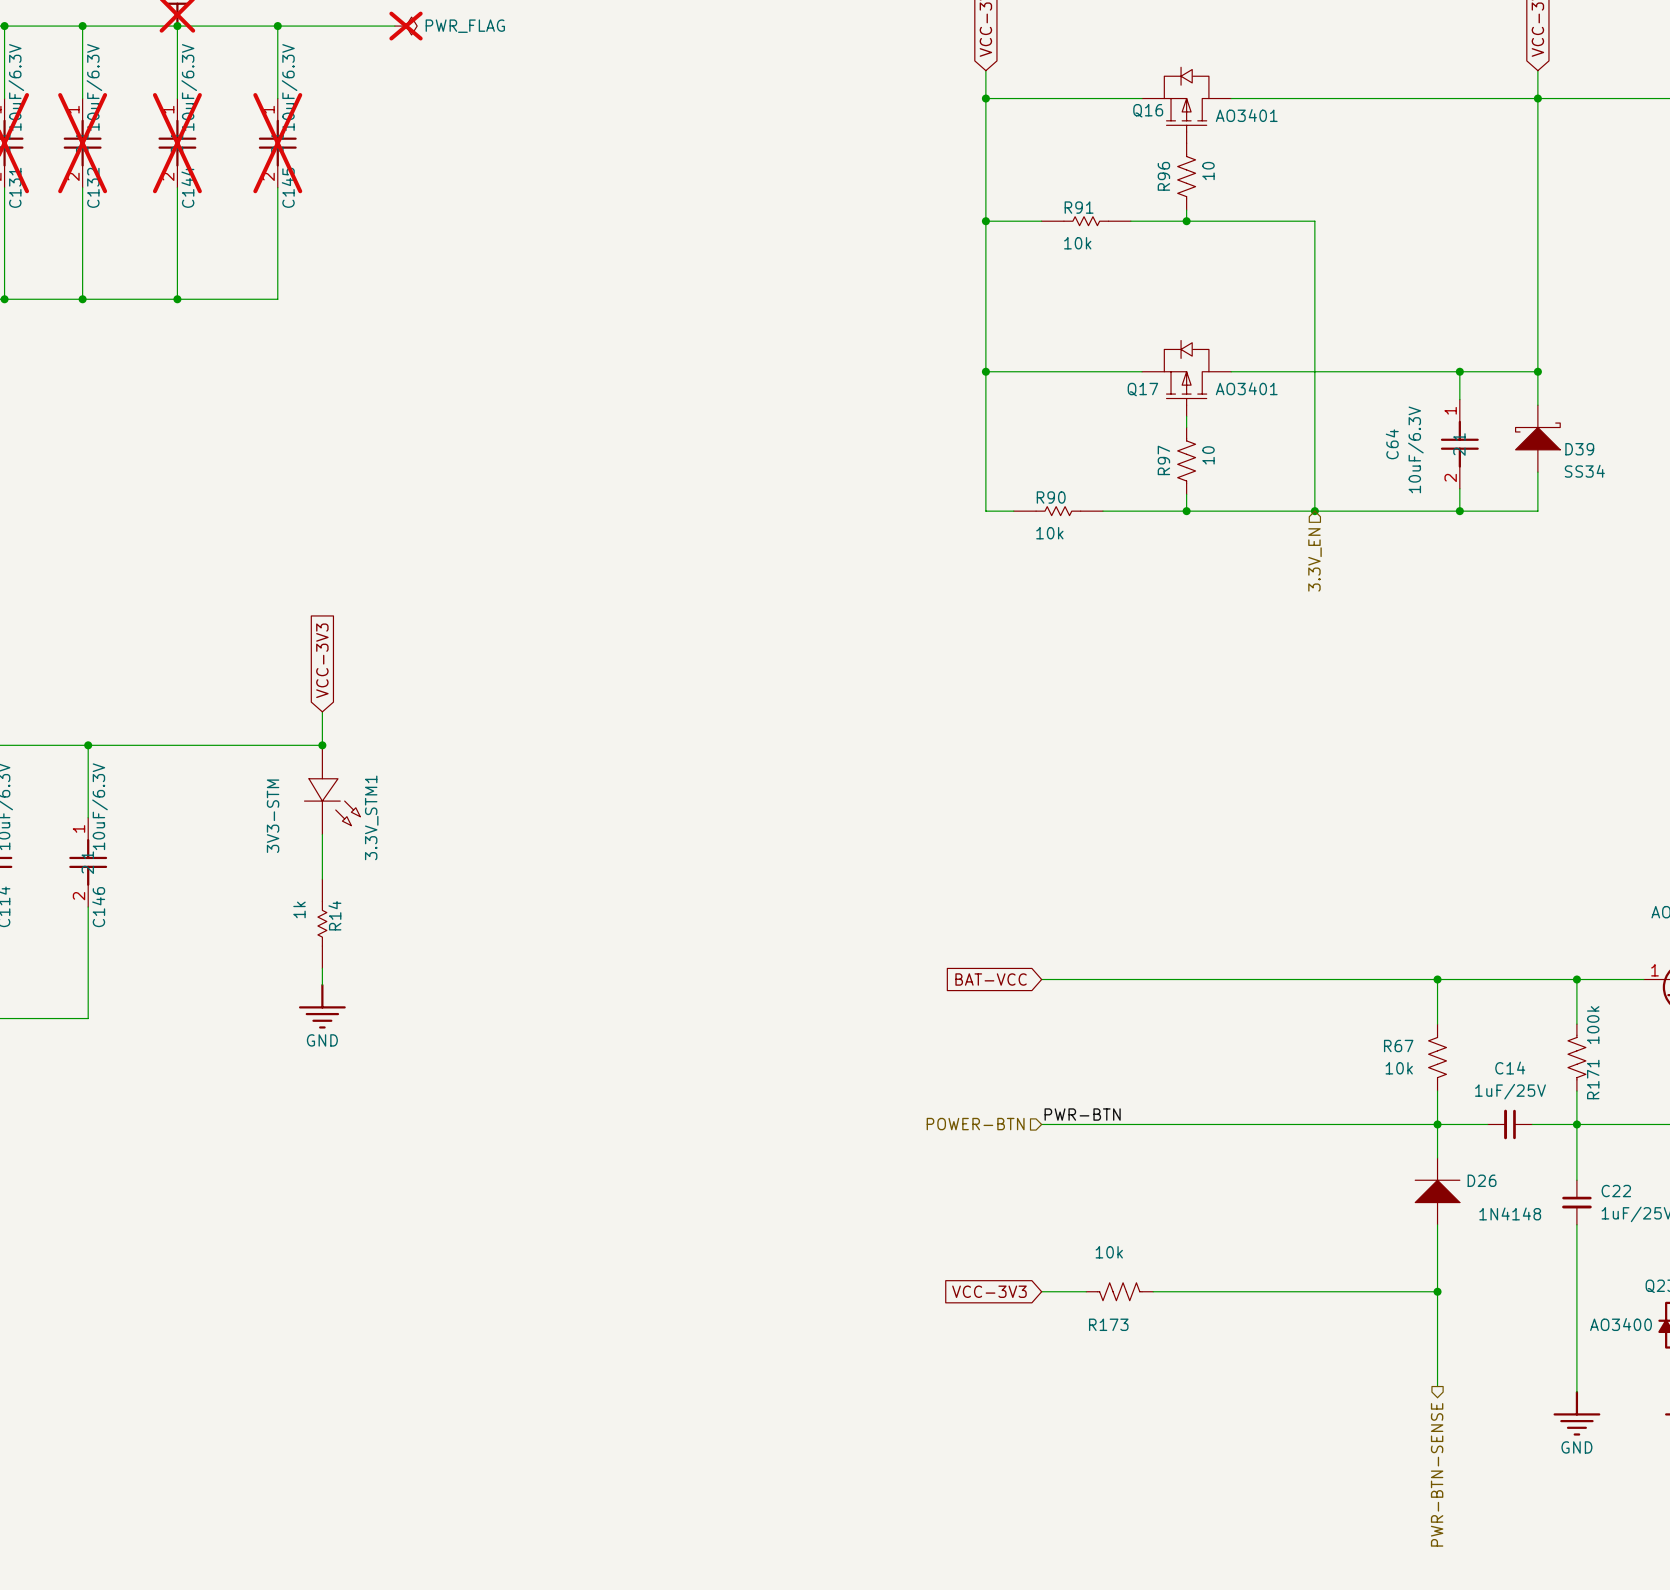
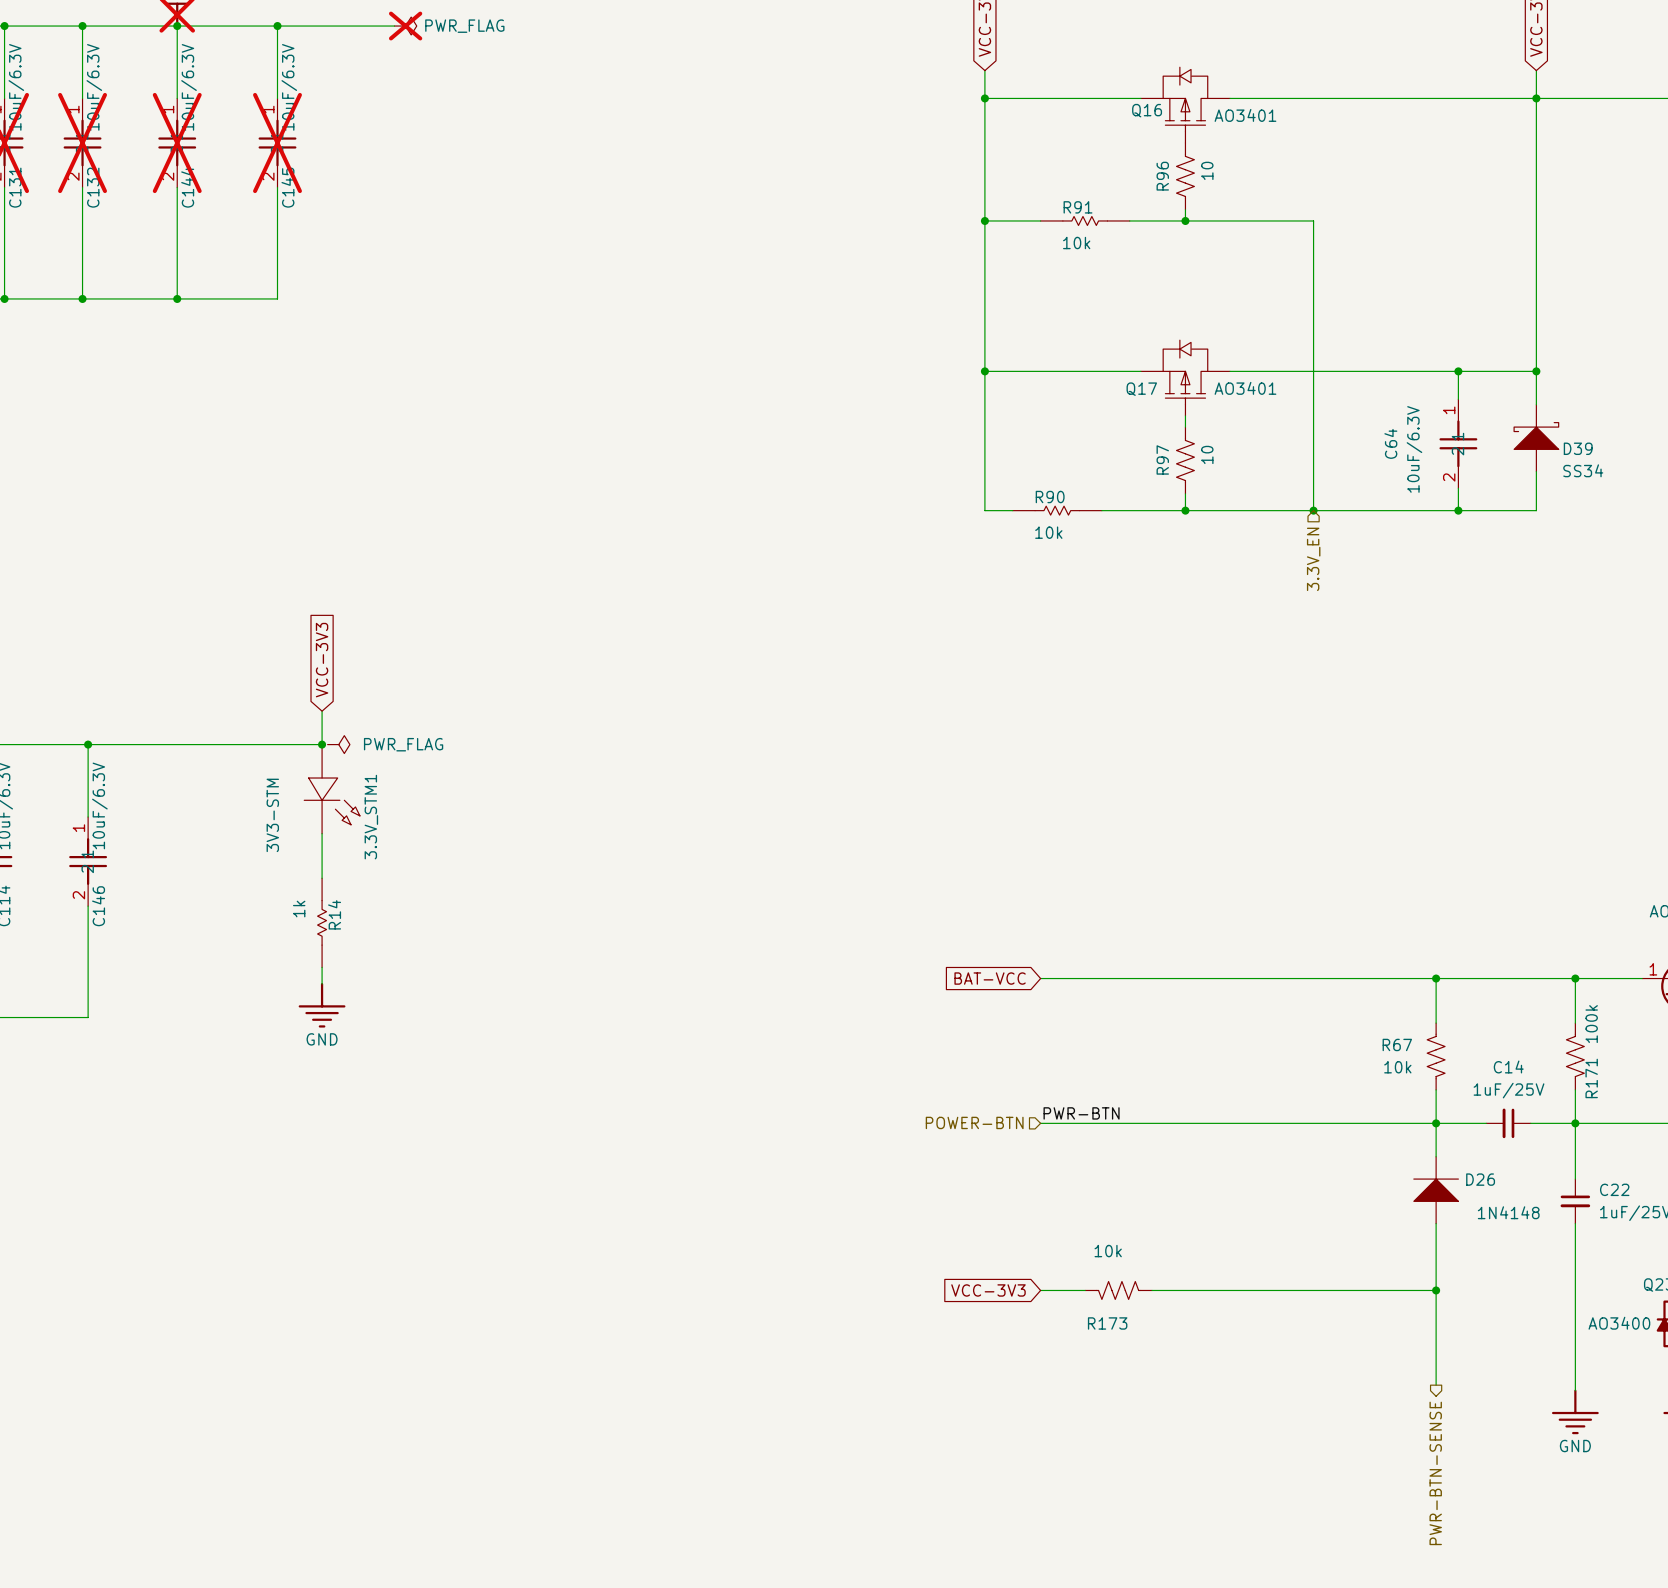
power symbol: none -> PWR_FLAG (338, 744)

